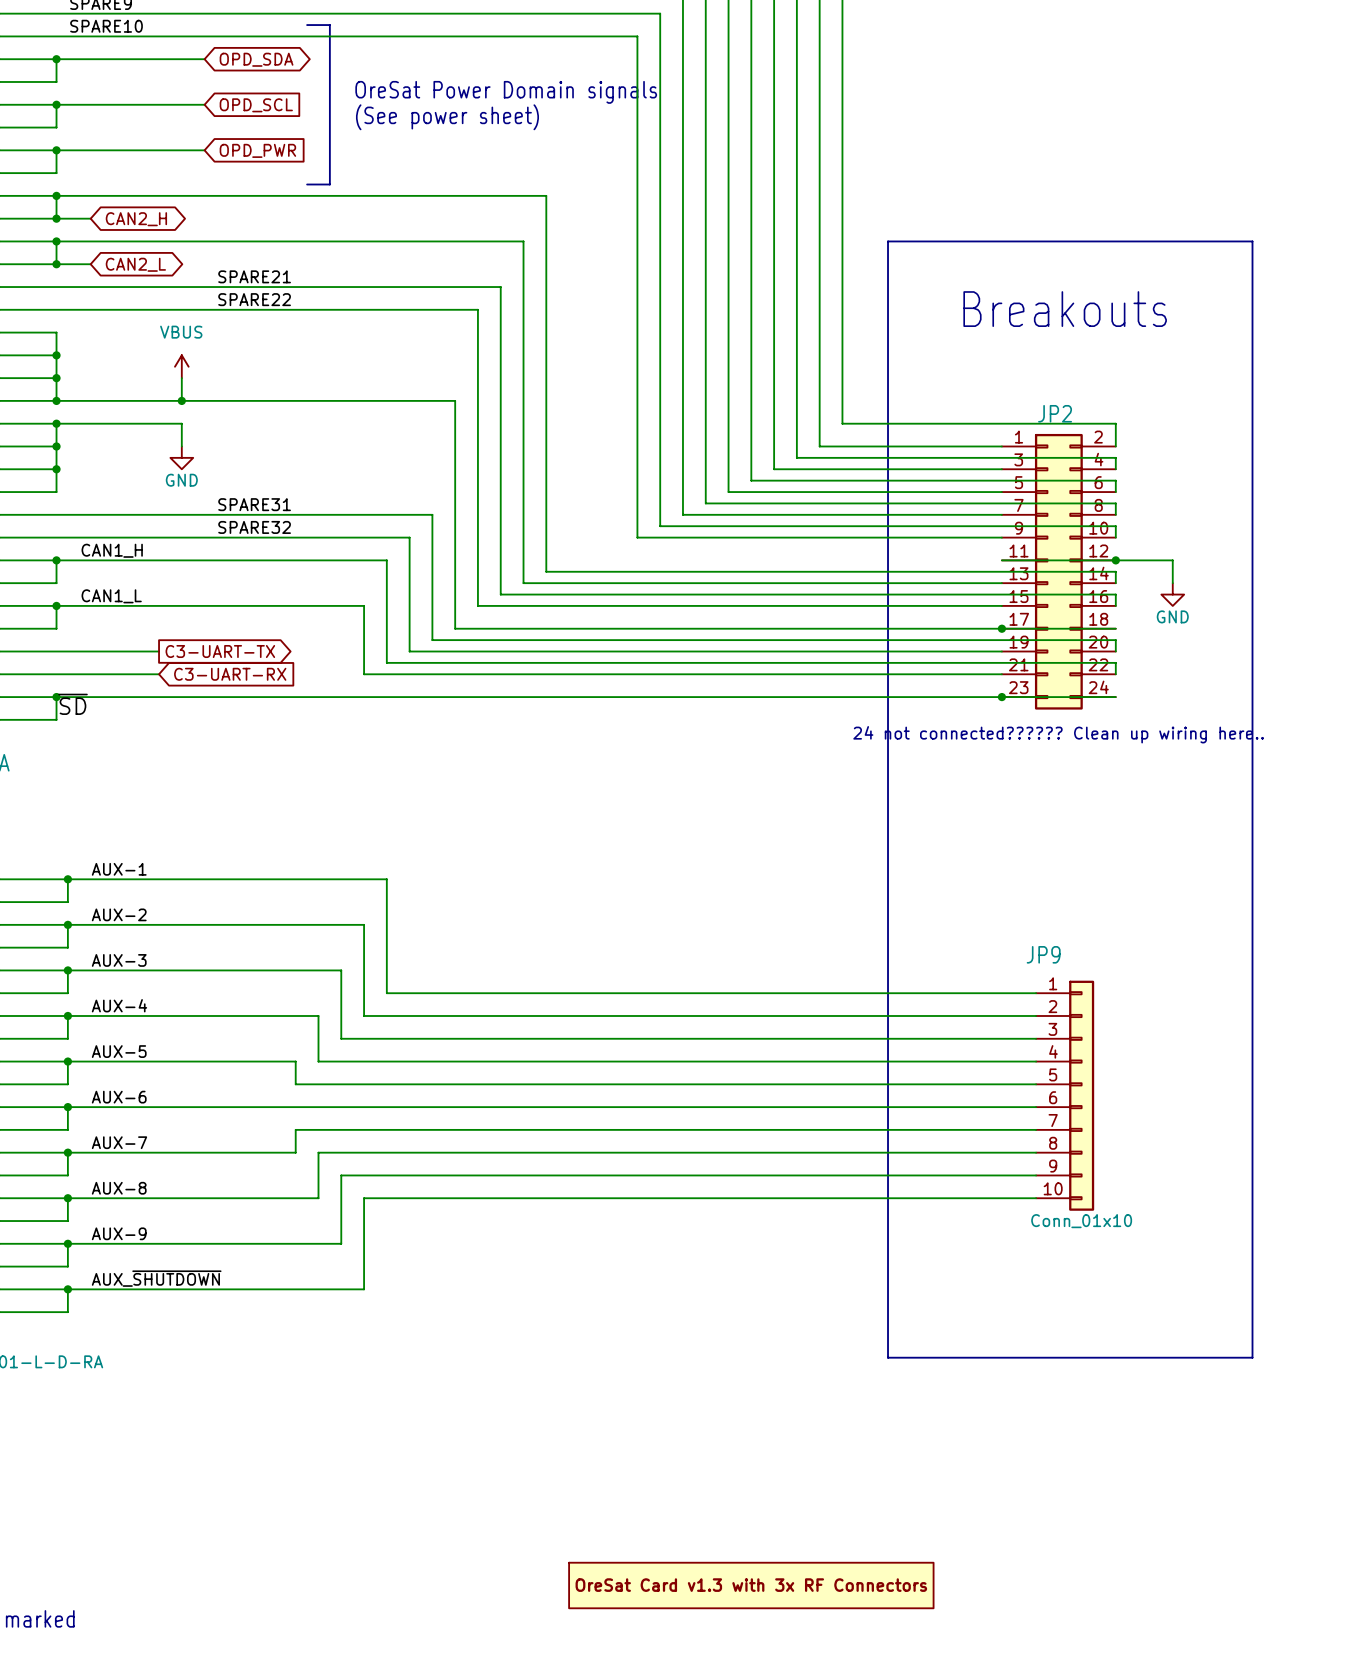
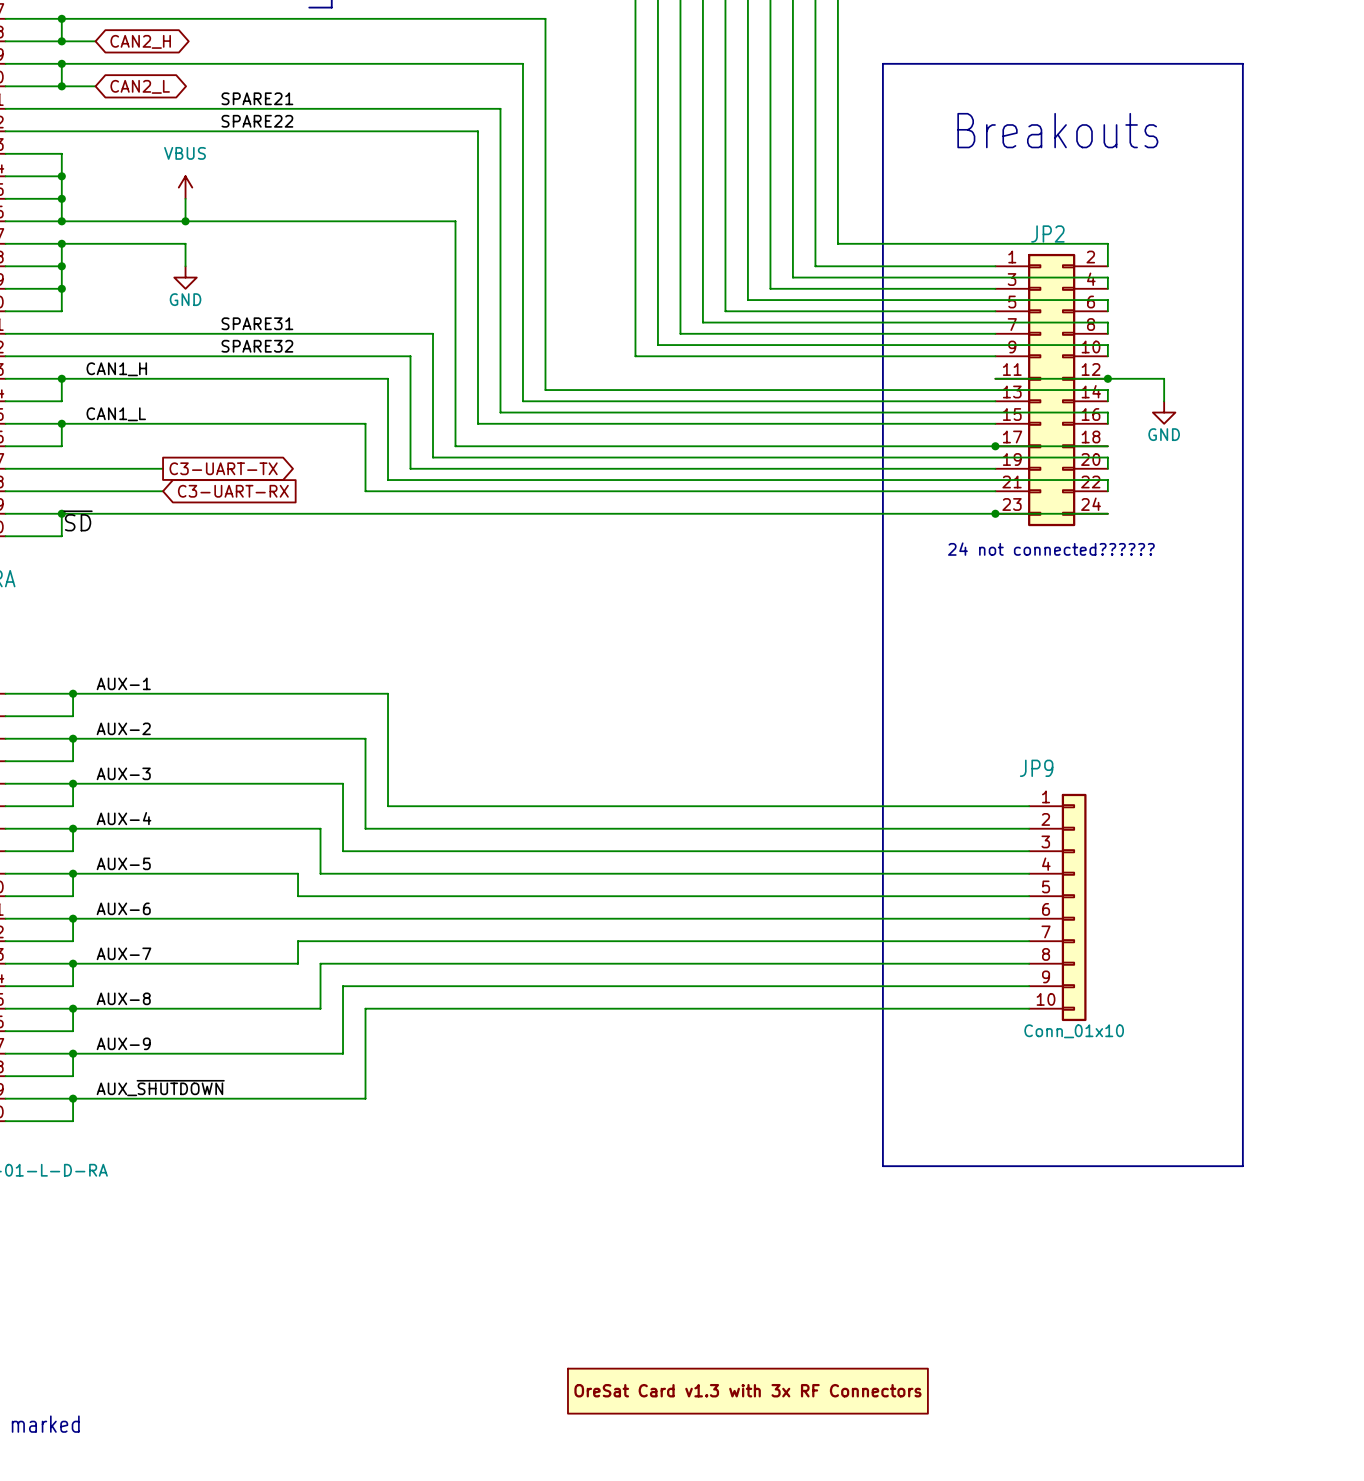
text: 24 not connected?????? Clean up wiring here.. (1058, 734) -> 24 not connected?????? (1051, 549)

